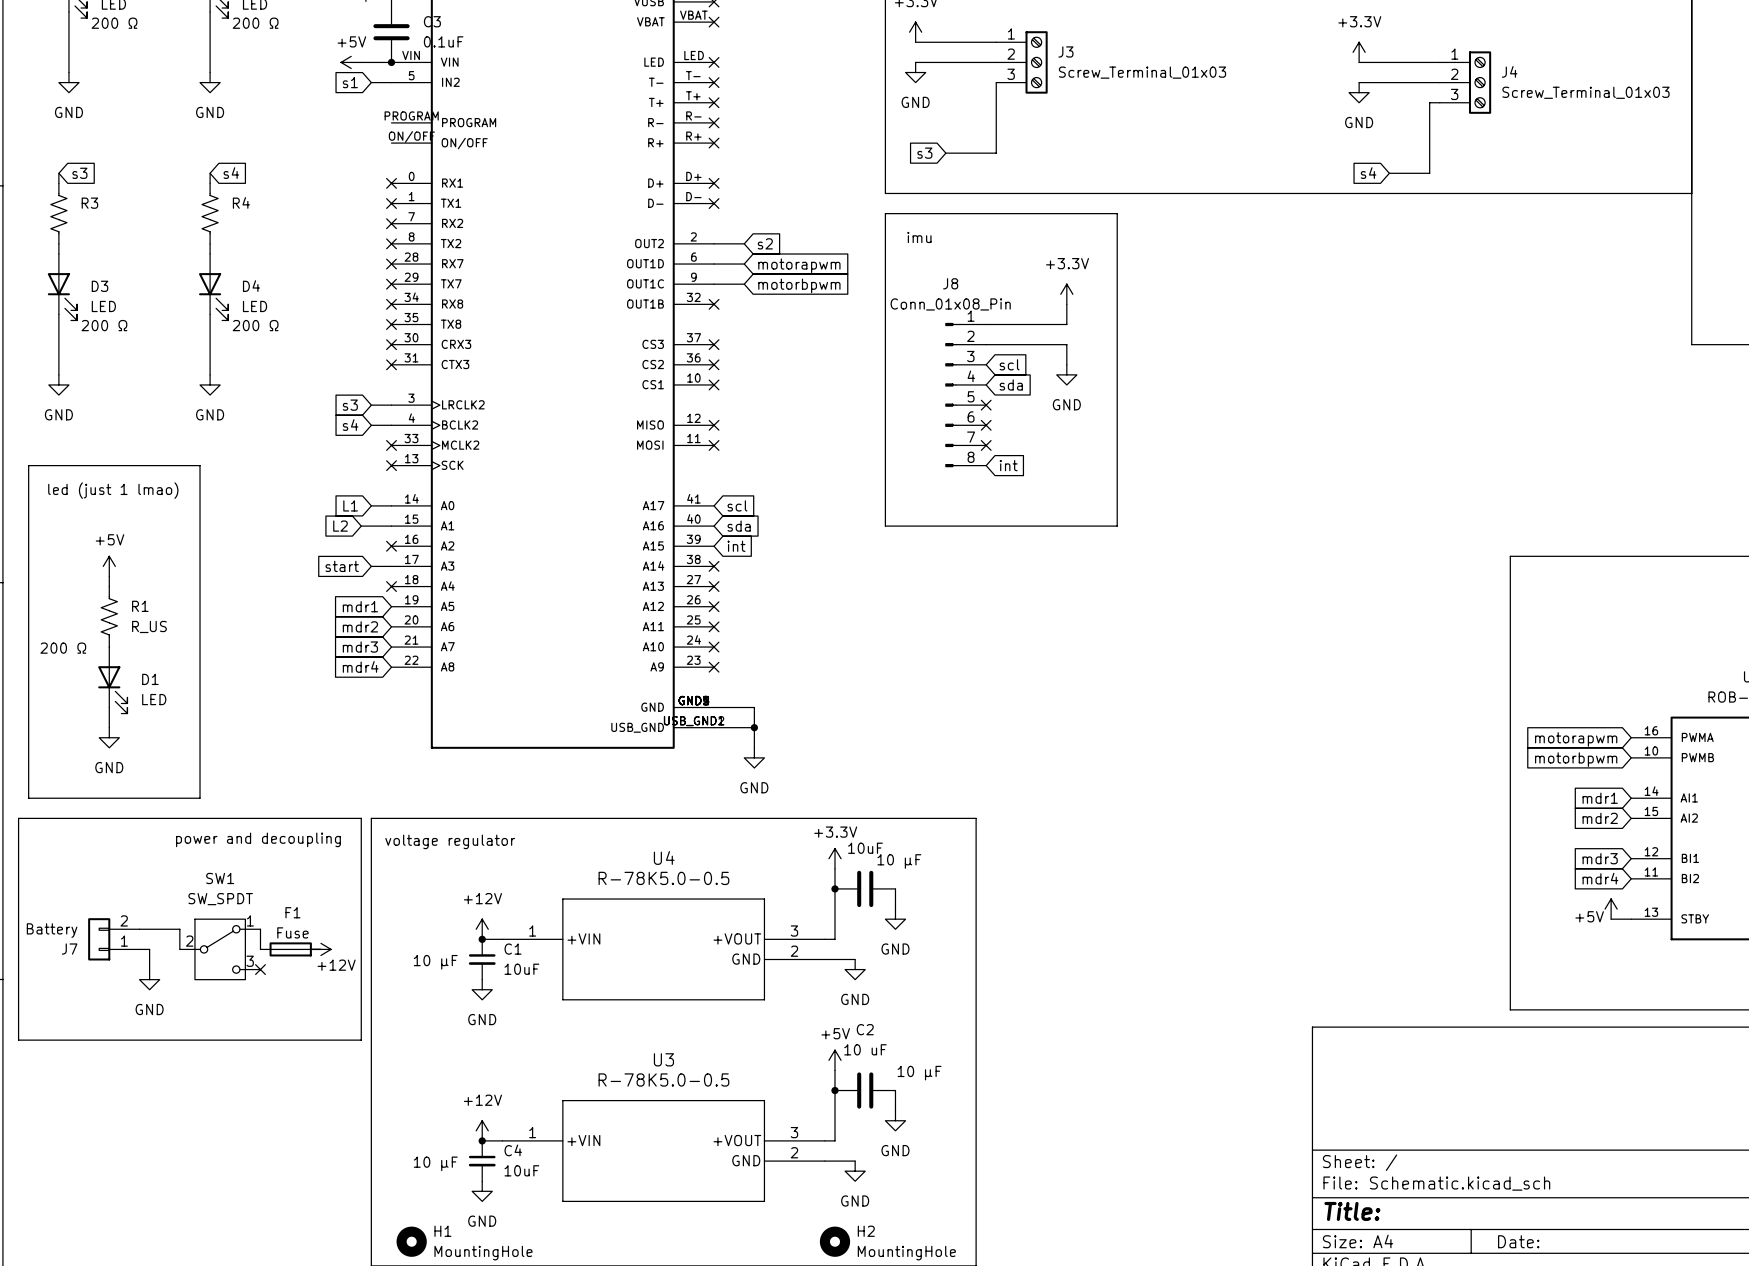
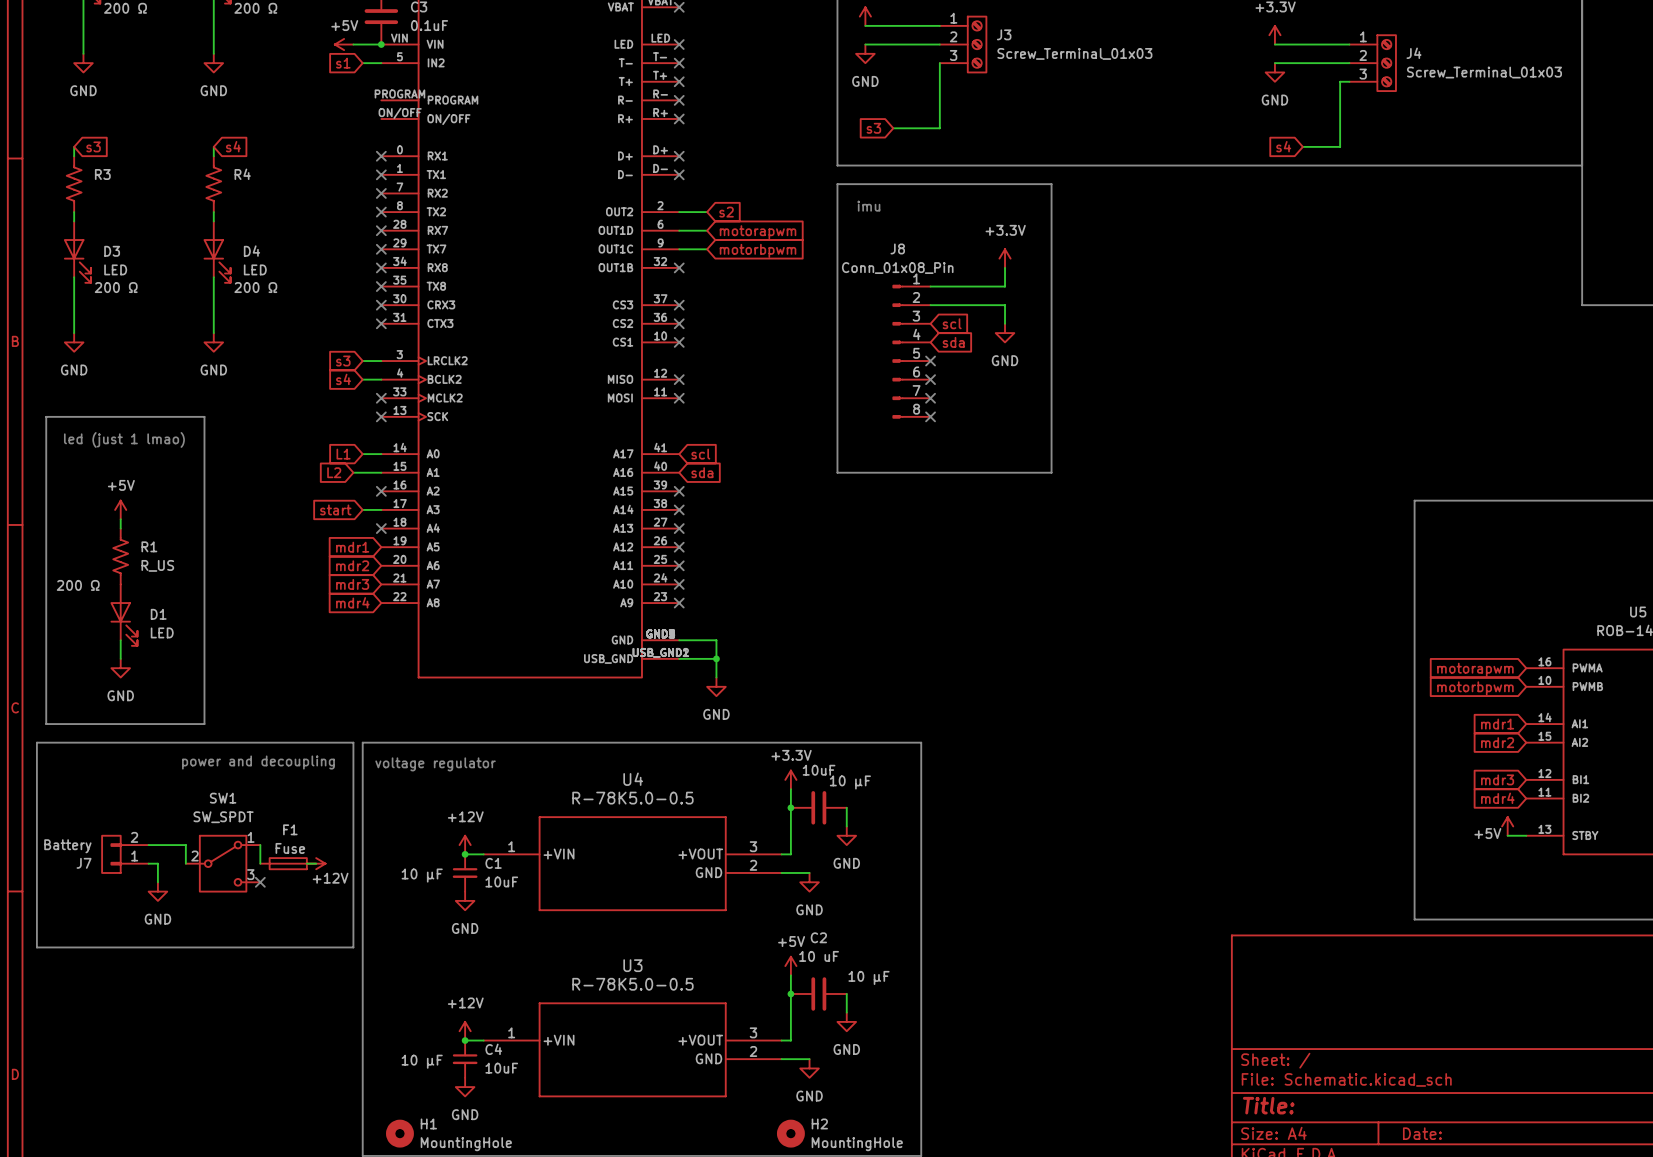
no-connect mark: none -> (930, 416)
global label: int (1008, 465) -> none
no-connect mark: none -> (679, 491)
global label: int (736, 546) -> none

